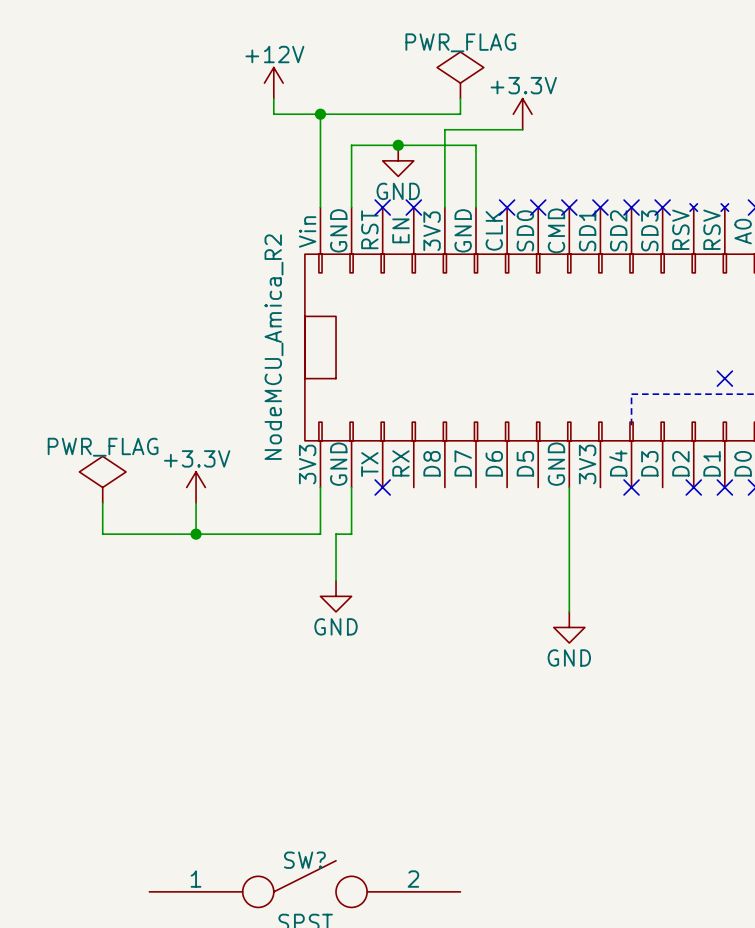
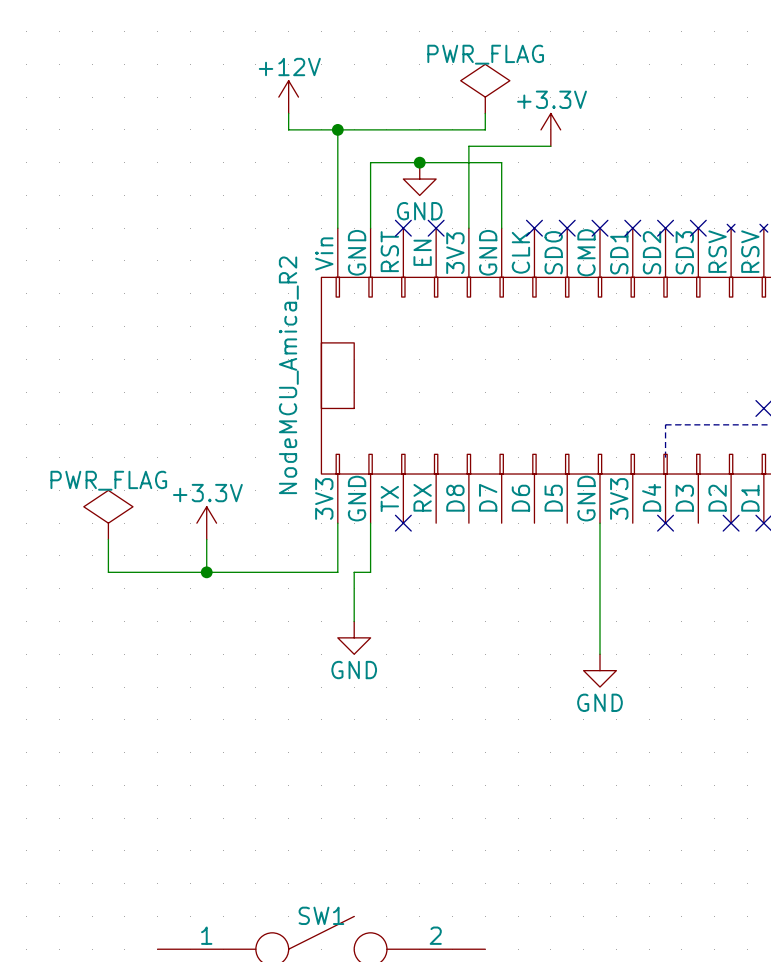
SW? name: SW? (304, 860) -> SW1 (321, 915)

